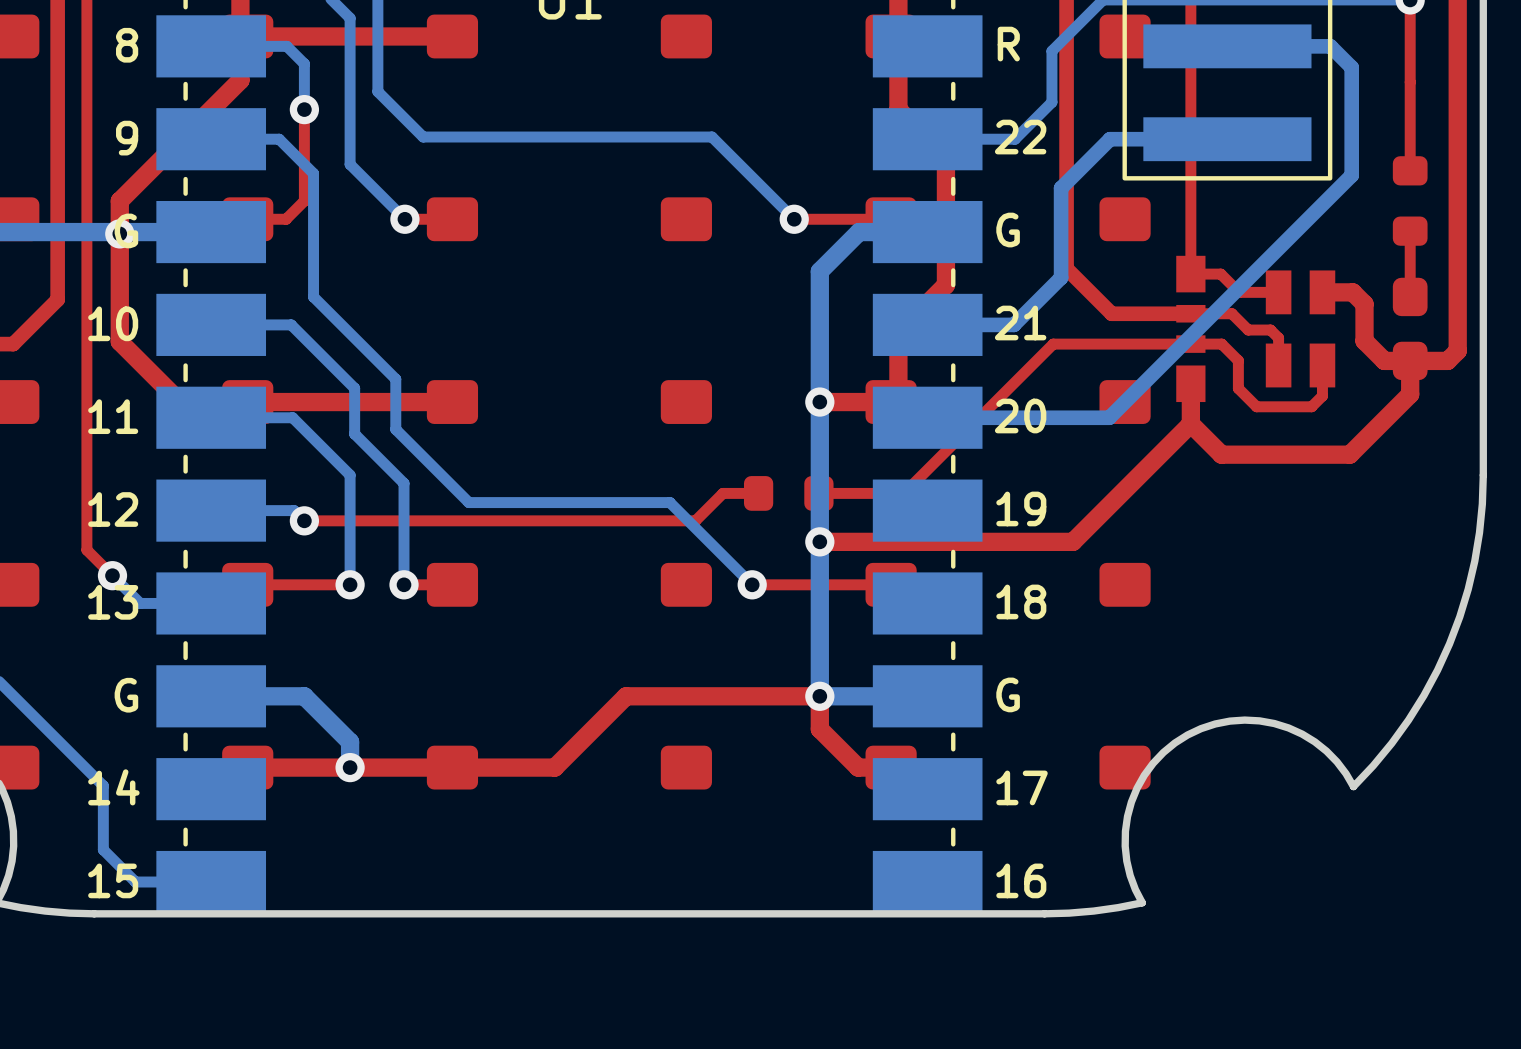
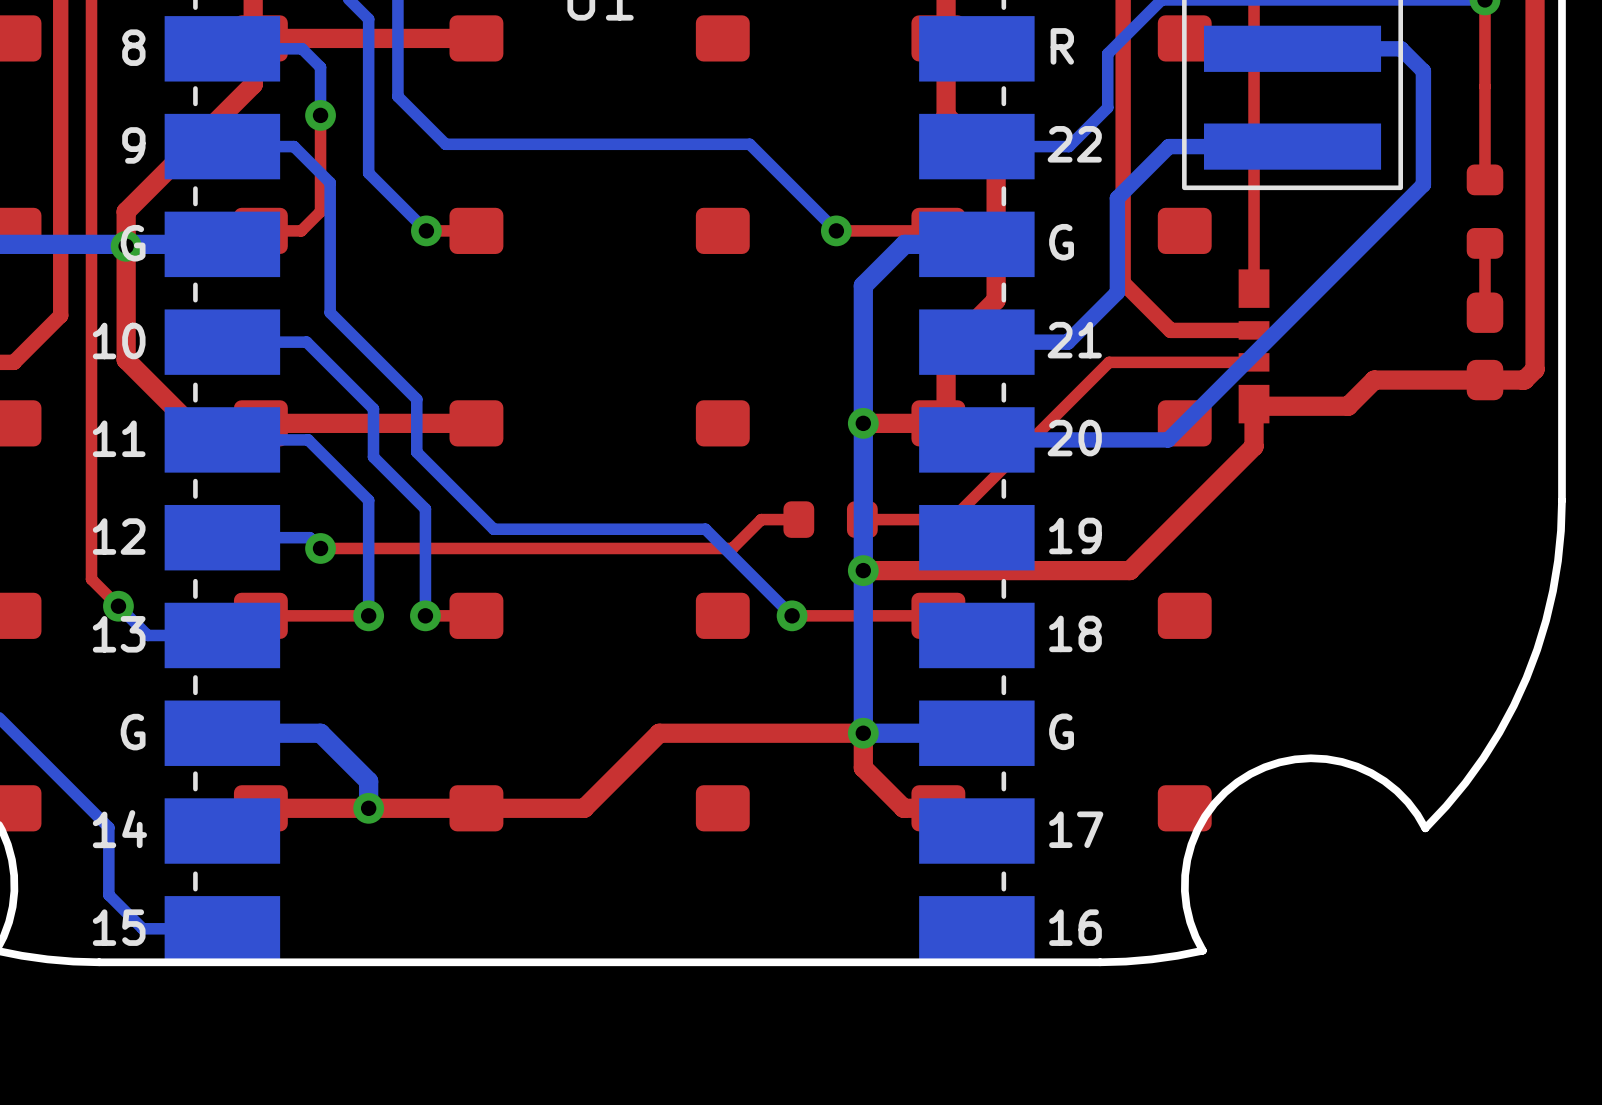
top track: (1190, 274) (1220, 274) (1239, 292) (1278, 292) -> none
top track: (1322, 292) (1352, 292) (1364, 304) (1364, 340) (1384, 360) -> (1254, 406) (1348, 406) (1374, 380) (1457, 380)
top track: (1190, 313) (1231, 313) (1248, 330) (1270, 330) (1278, 338) (1278, 365) -> none
part: (1300, 328) -> none
top track: (1190, 344) (1221, 344) (1238, 360) (1238, 388) (1256, 406) (1311, 406) (1322, 396) (1322, 365) -> none
top track: (1410, 360) (1410, 394) (1349, 454) (1221, 454) (1190, 423) -> none

